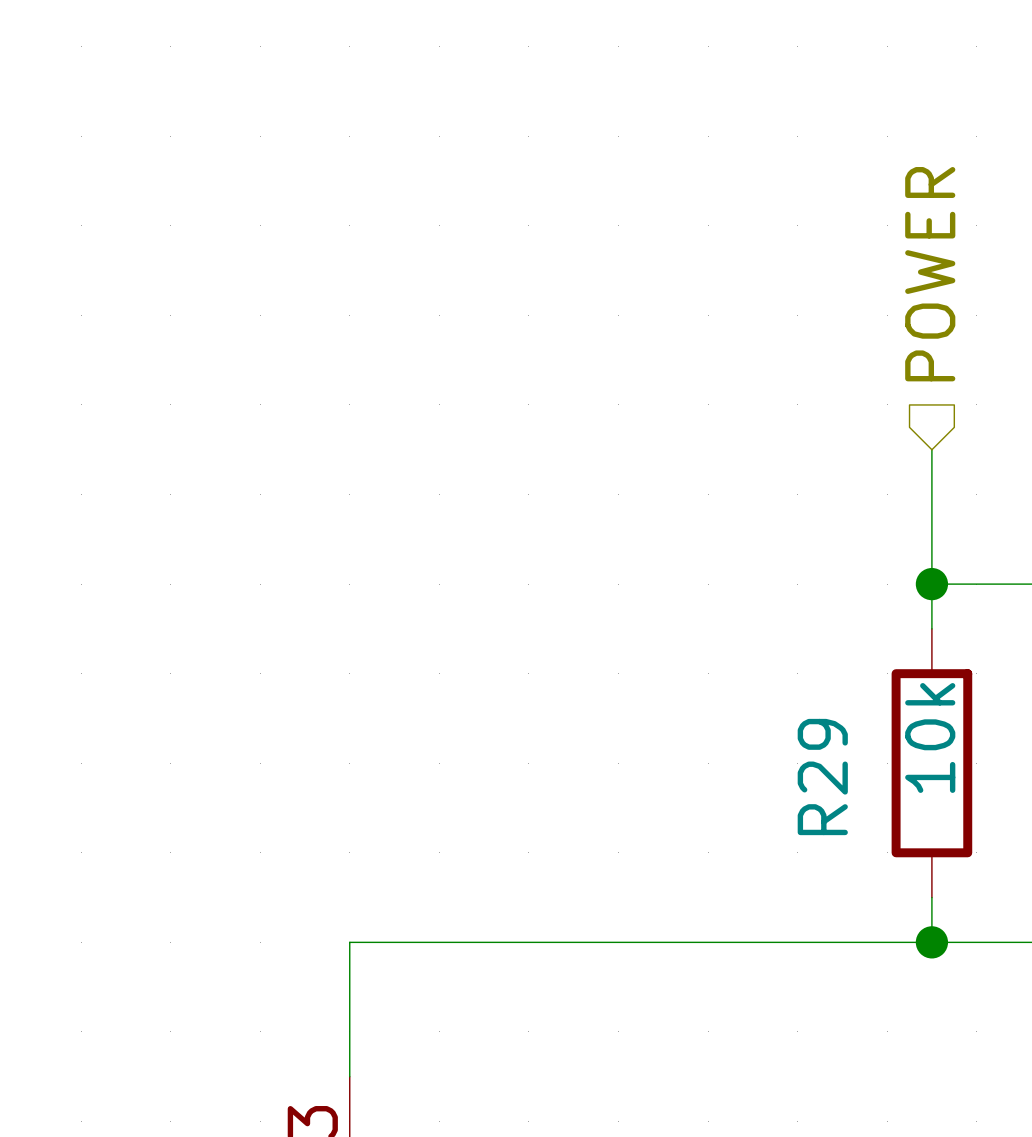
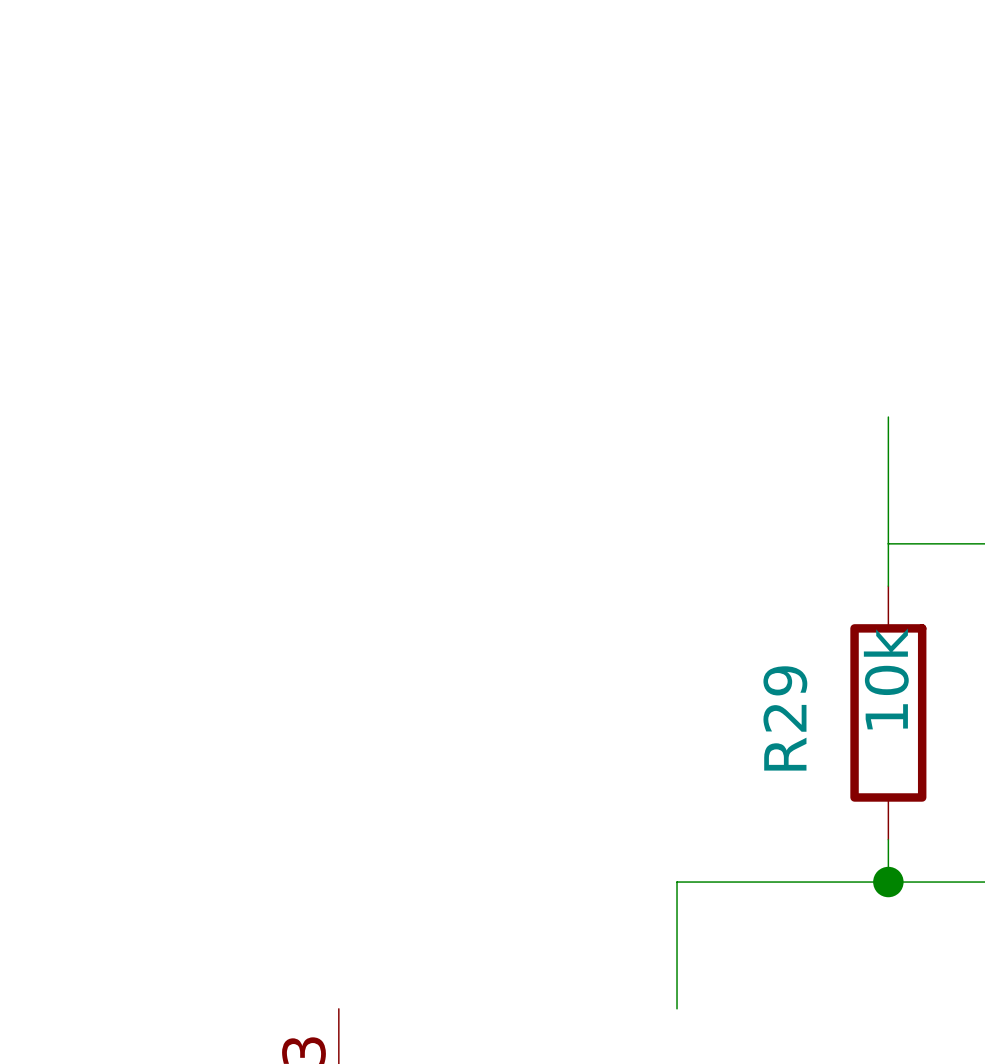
hierarchical label: POWER (930, 274) -> none
junction: (931, 584) -> none
wire: (708, 942) (349, 942) (349, 1076) -> (677, 882) (677, 1008)

